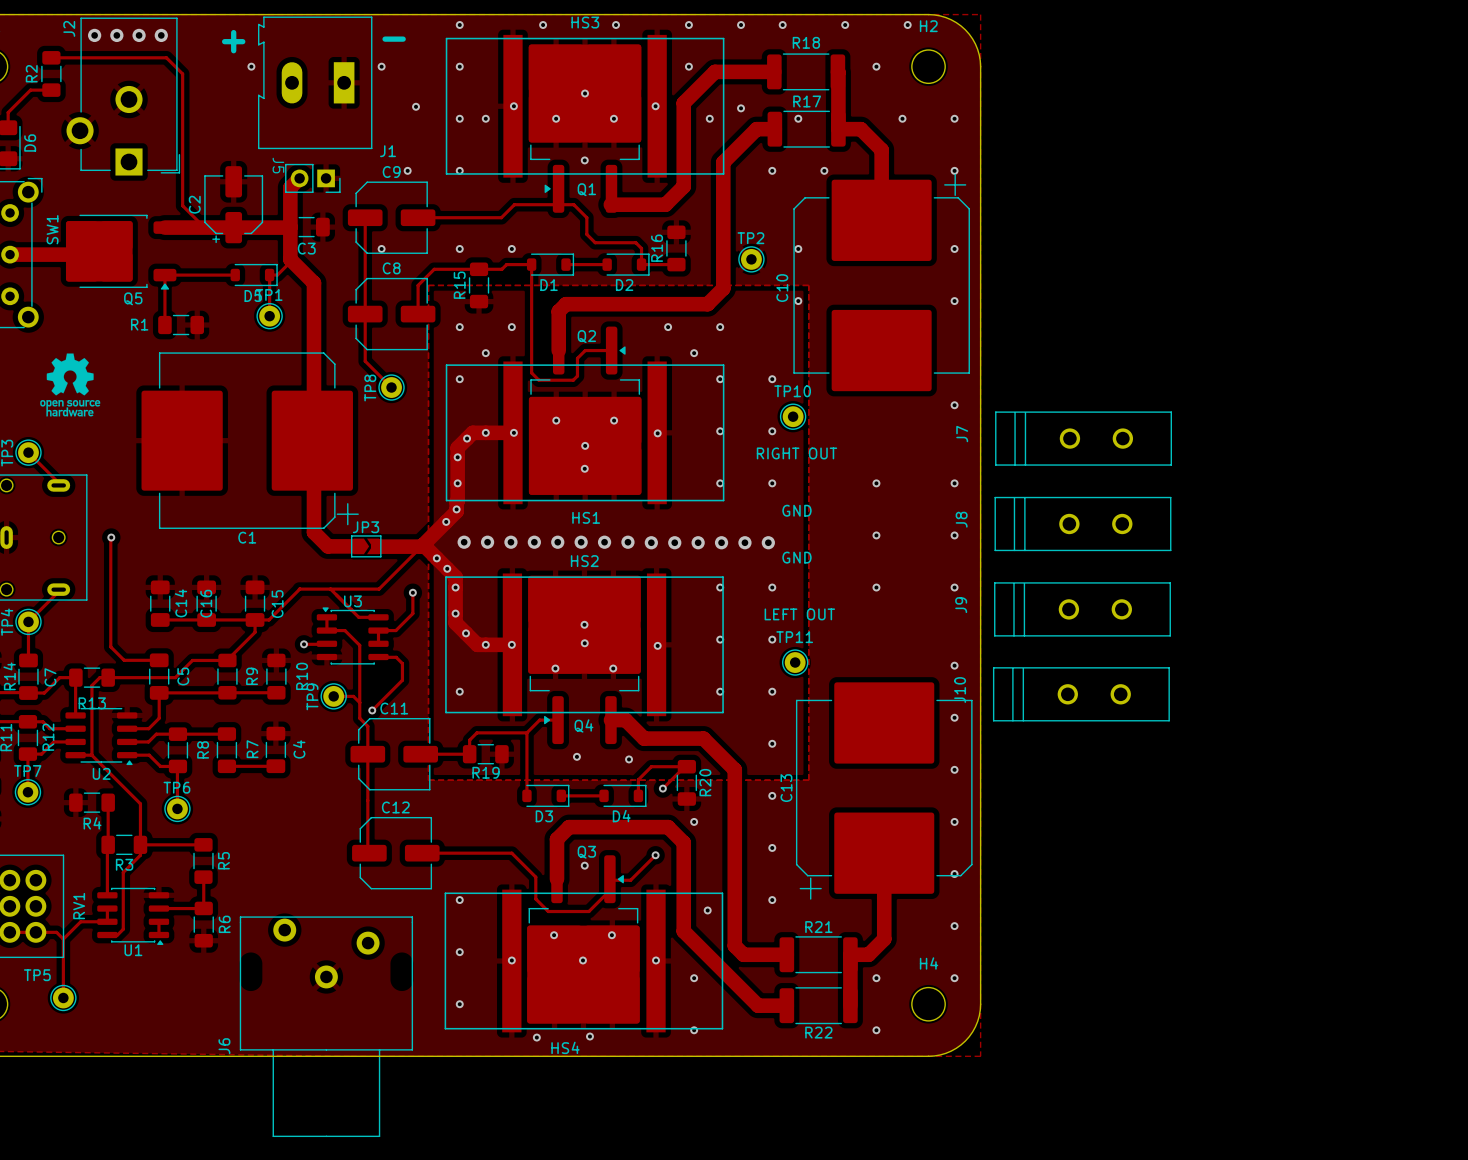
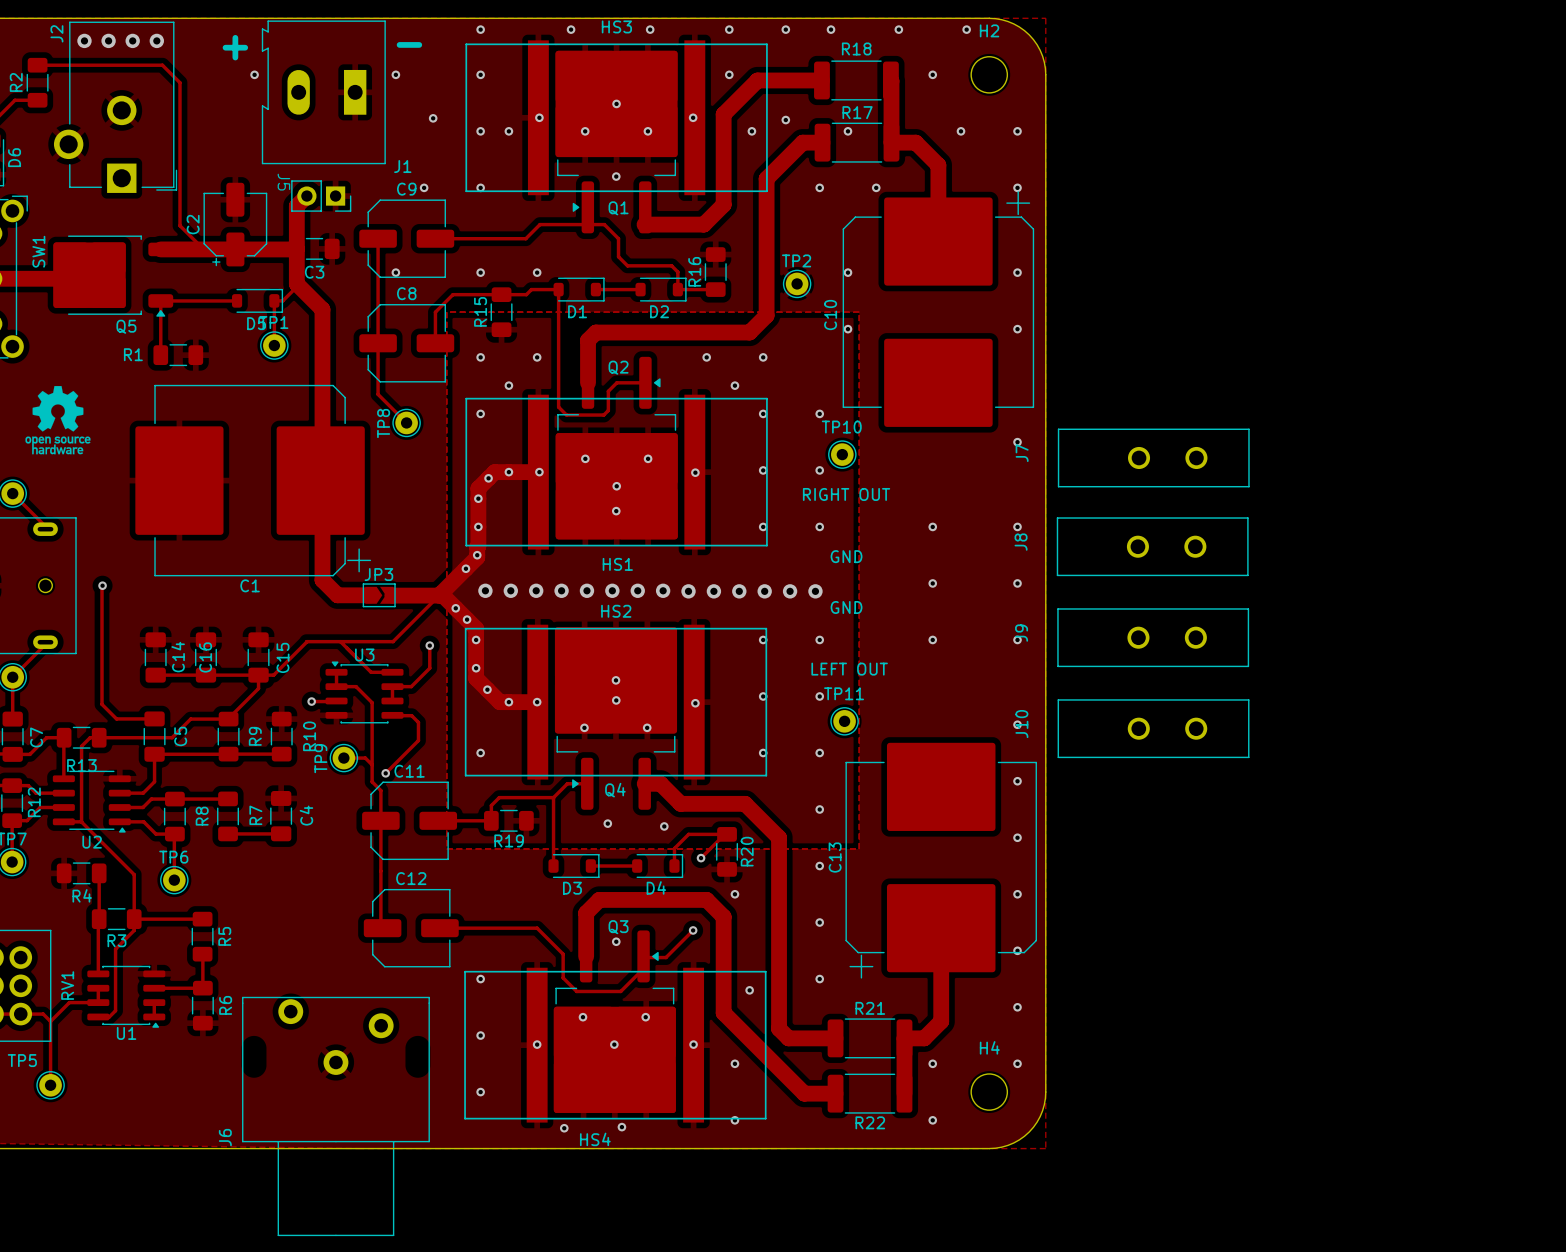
J7 footprint: [995, 411, 1172, 466] -> [1057, 428, 1250, 488]
J8 footprint: [994, 496, 1172, 552] -> [1056, 517, 1249, 577]
J9 footprint: [994, 582, 1171, 637] -> [1057, 608, 1250, 668]
J10 footprint: [992, 667, 1170, 722] -> [1057, 699, 1250, 759]

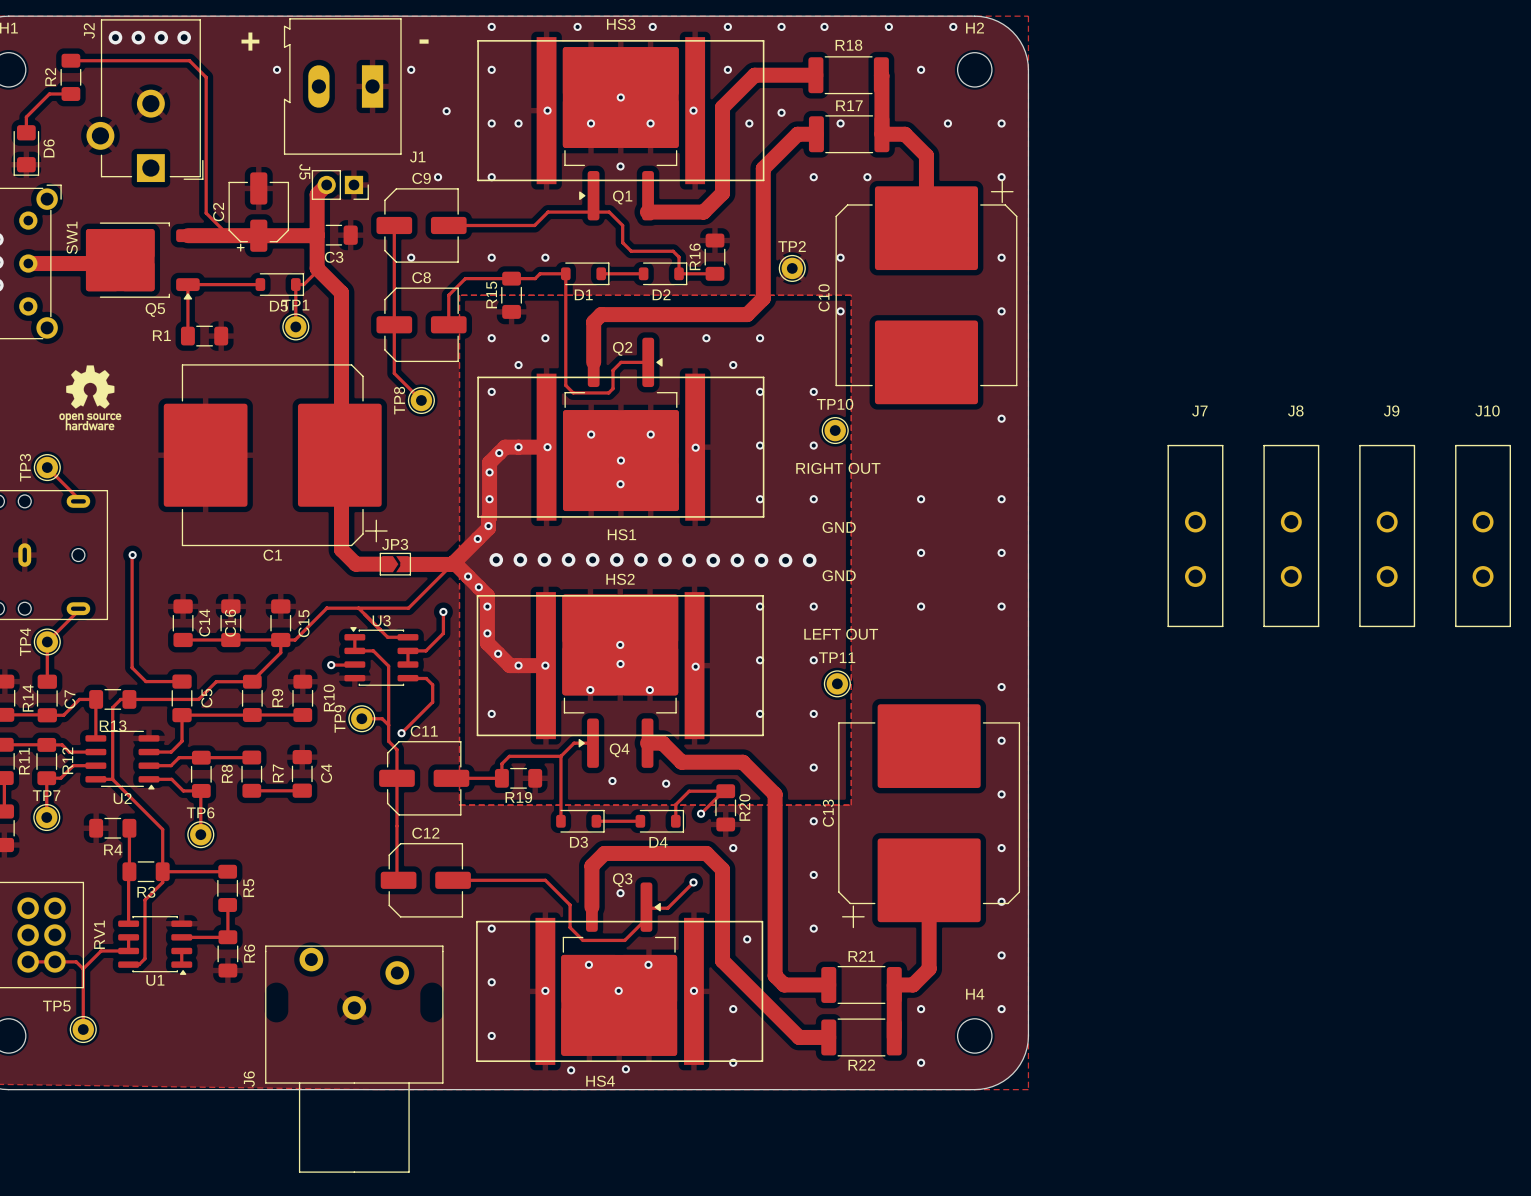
J7 rotation: 0° (1153, 457) -> 90° clockwise (1195, 535)
J7 position: (1153, 457) -> (1195, 535)
J8 rotation: 0° (1152, 546) -> 90° clockwise (1291, 535)
J8 position: (1152, 546) -> (1291, 535)
J9 rotation: 0° (1153, 637) -> 90° clockwise (1387, 535)
J9 position: (1153, 637) -> (1387, 535)
J10 rotation: 0° (1153, 728) -> 90° clockwise (1483, 535)
J10 position: (1153, 728) -> (1483, 535)

